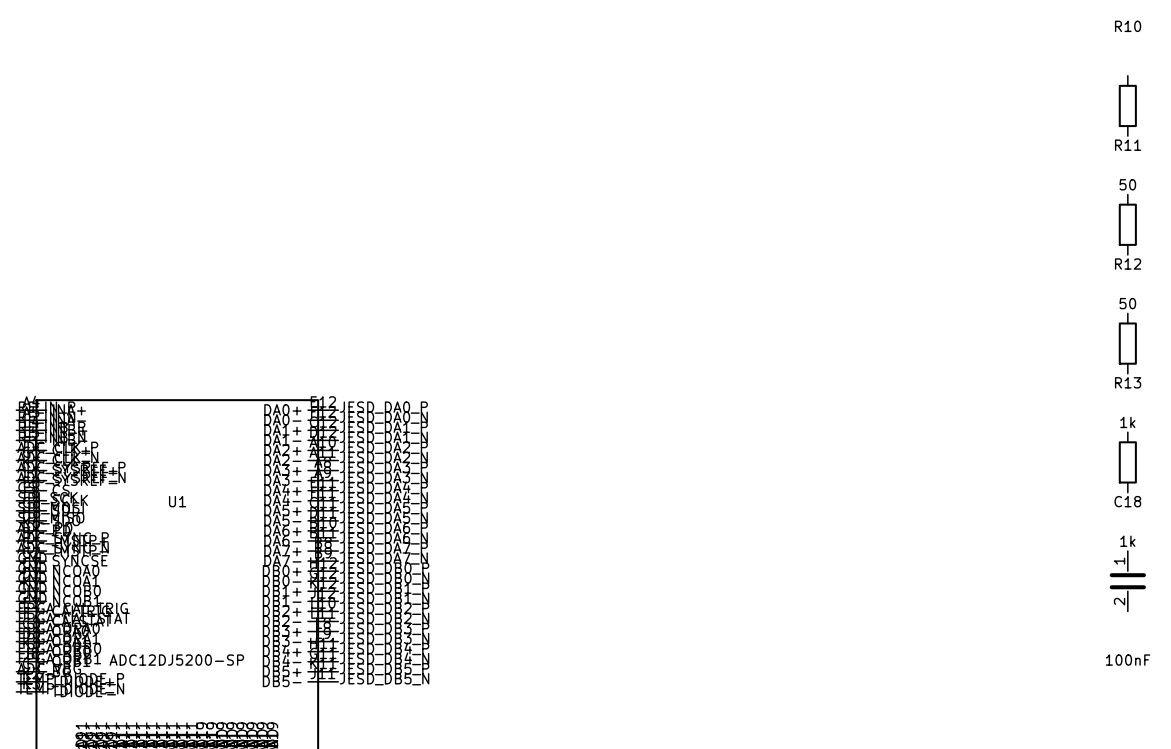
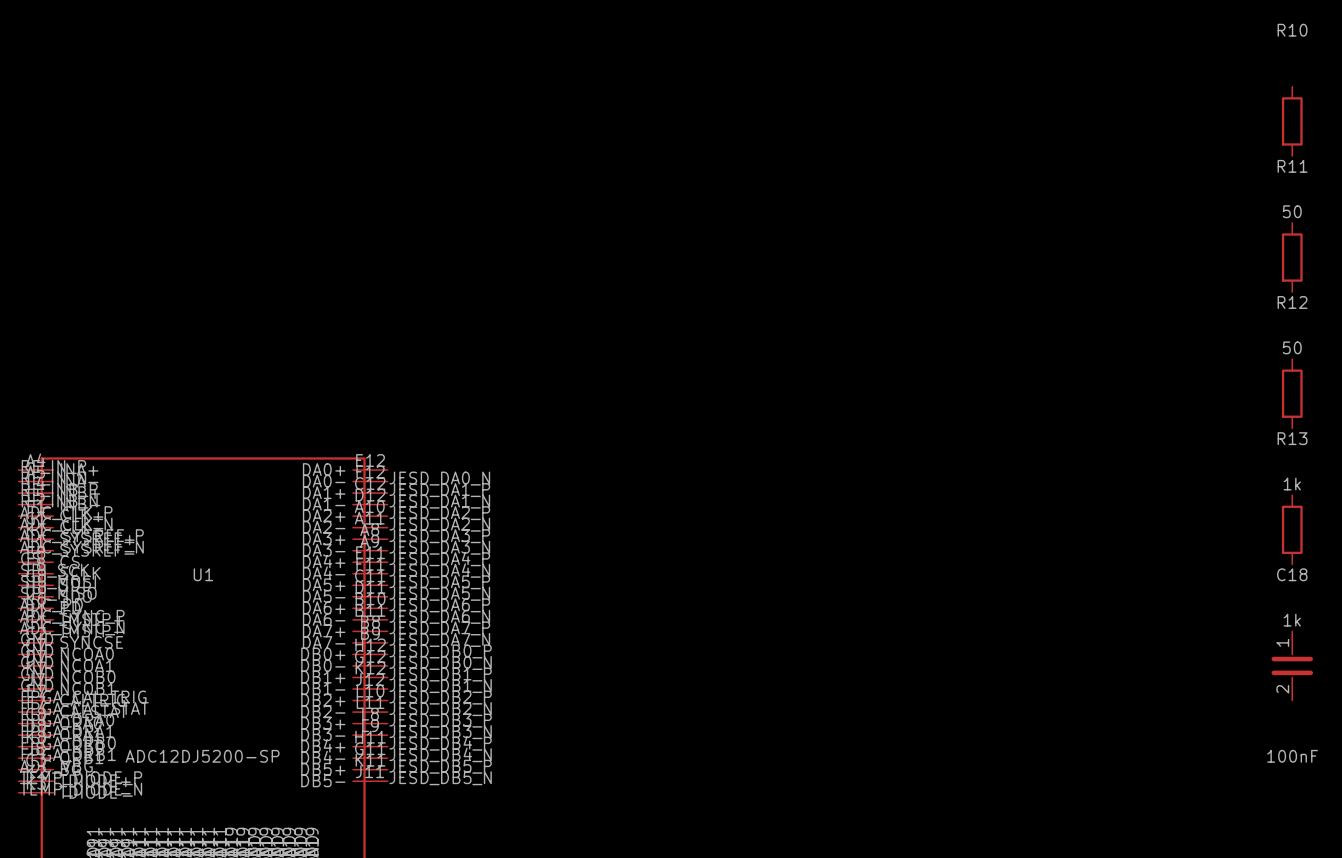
label: JESD_DA0_P (383, 407) -> none

